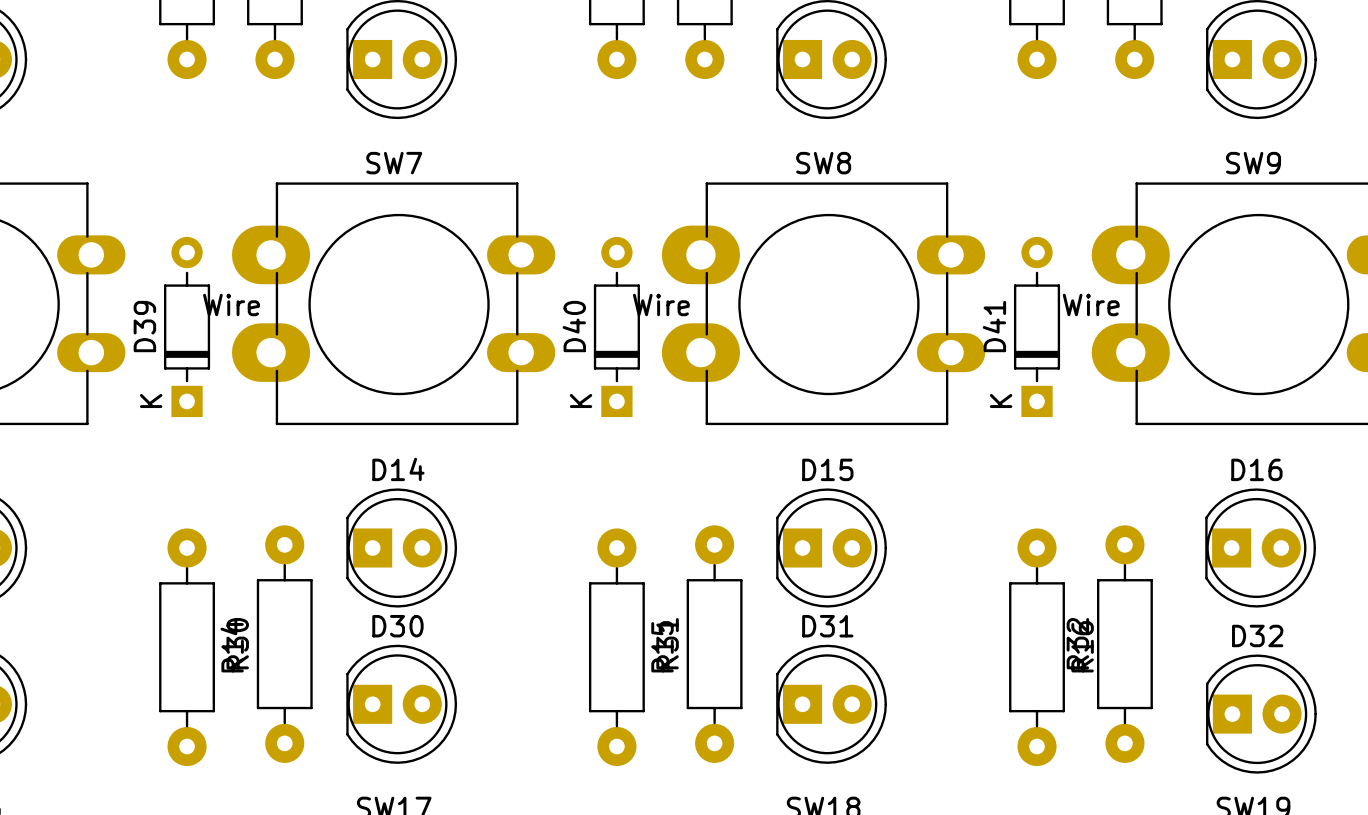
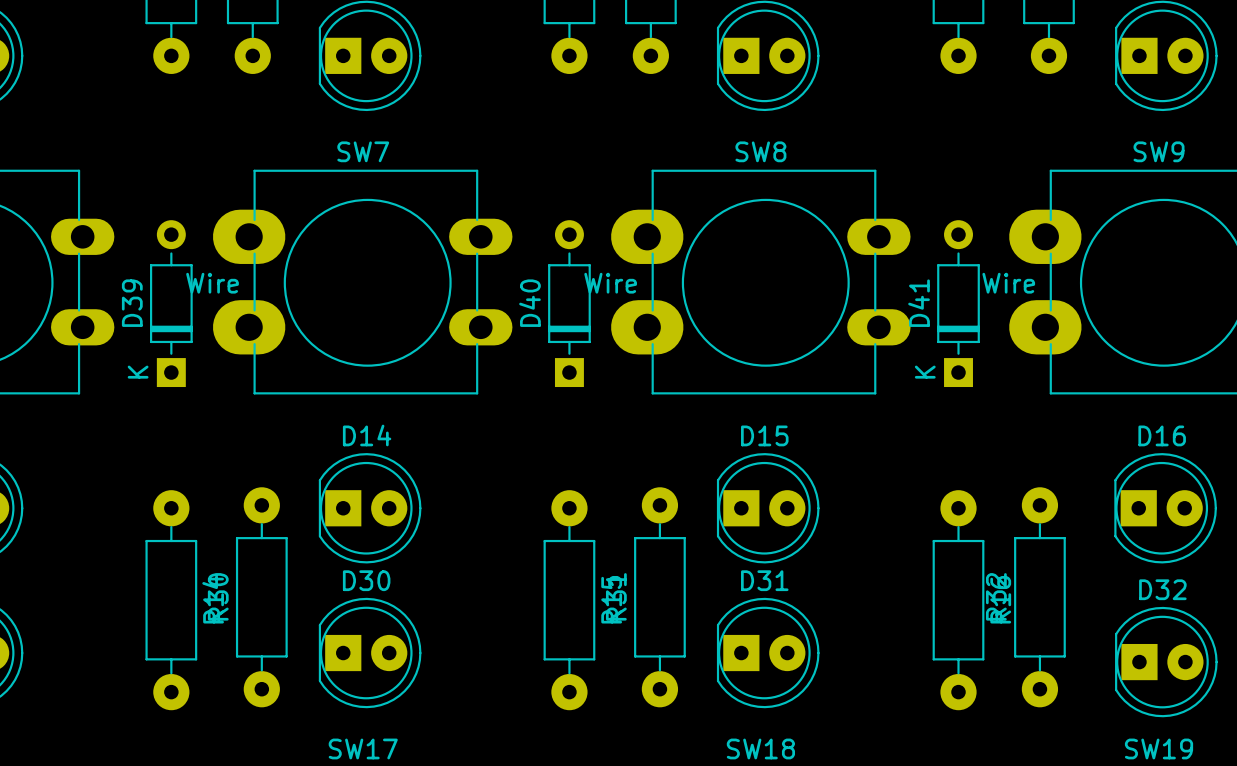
D40 text: K (581, 400) -> none

